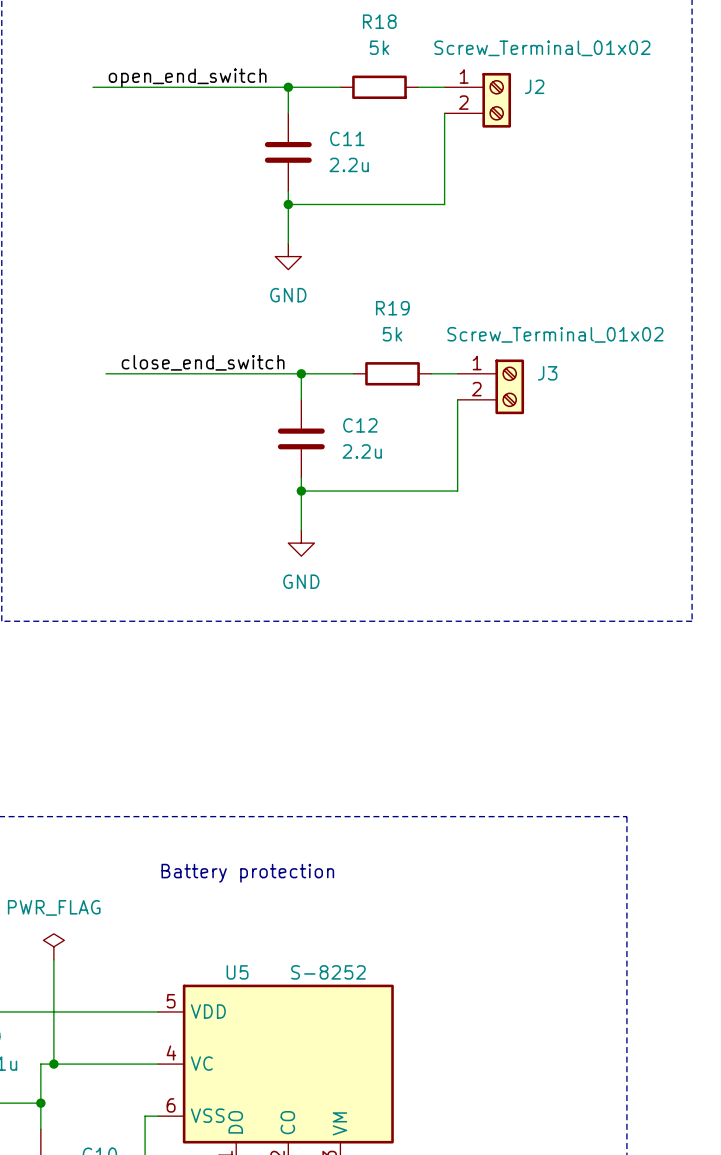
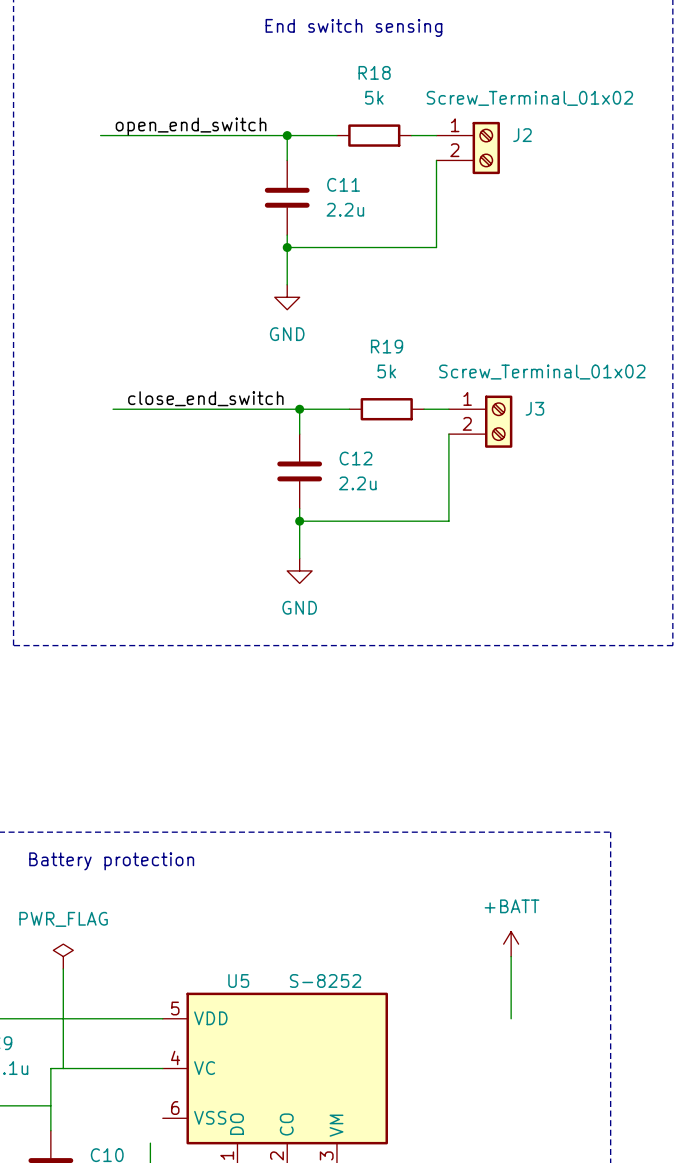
text position: Battery protection (247, 873) -> Battery protection (111, 861)
power symbol: none -> +BATT (511, 944)
wire: none -> (511, 956) (511, 1018)
junction: (53, 1064) -> none
junction: (40, 1103) -> none
wire: (158, 1116) (145, 1116) (145, 1142) -> none

